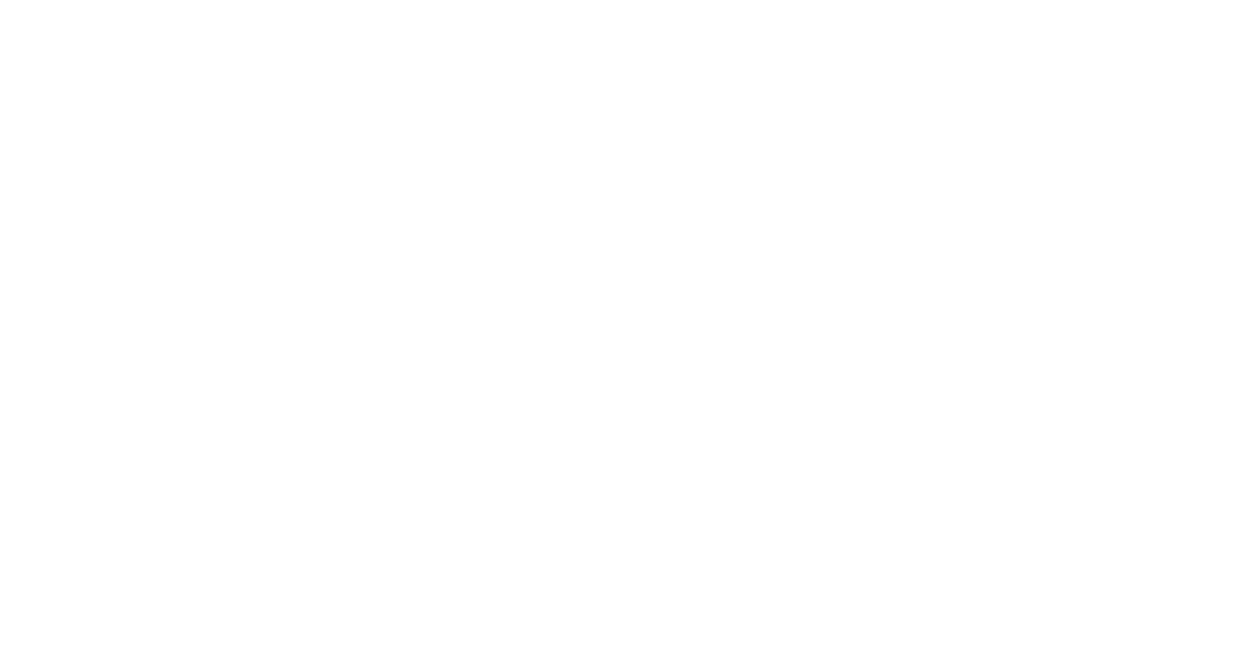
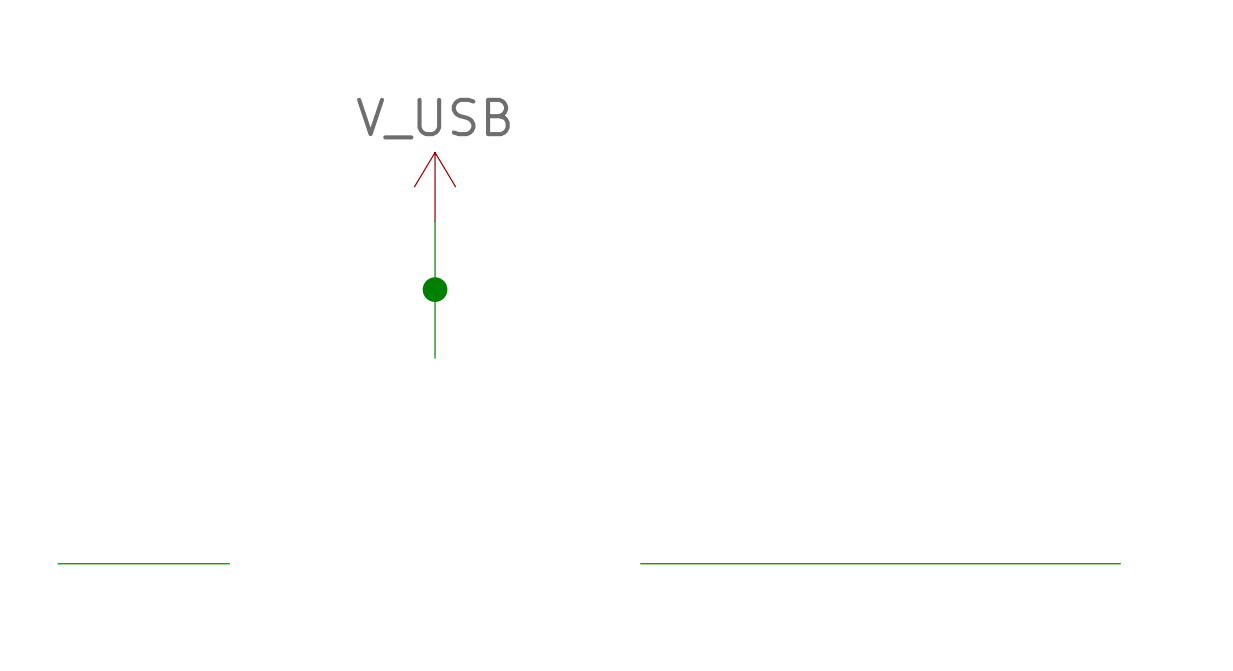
power symbol: none -> V_USB (435, 186)
wire: none -> (435, 221) (435, 358)
junction: none -> (435, 289)
wire: none -> (58, 563) (229, 563)
wire: none -> (640, 563) (1120, 563)

